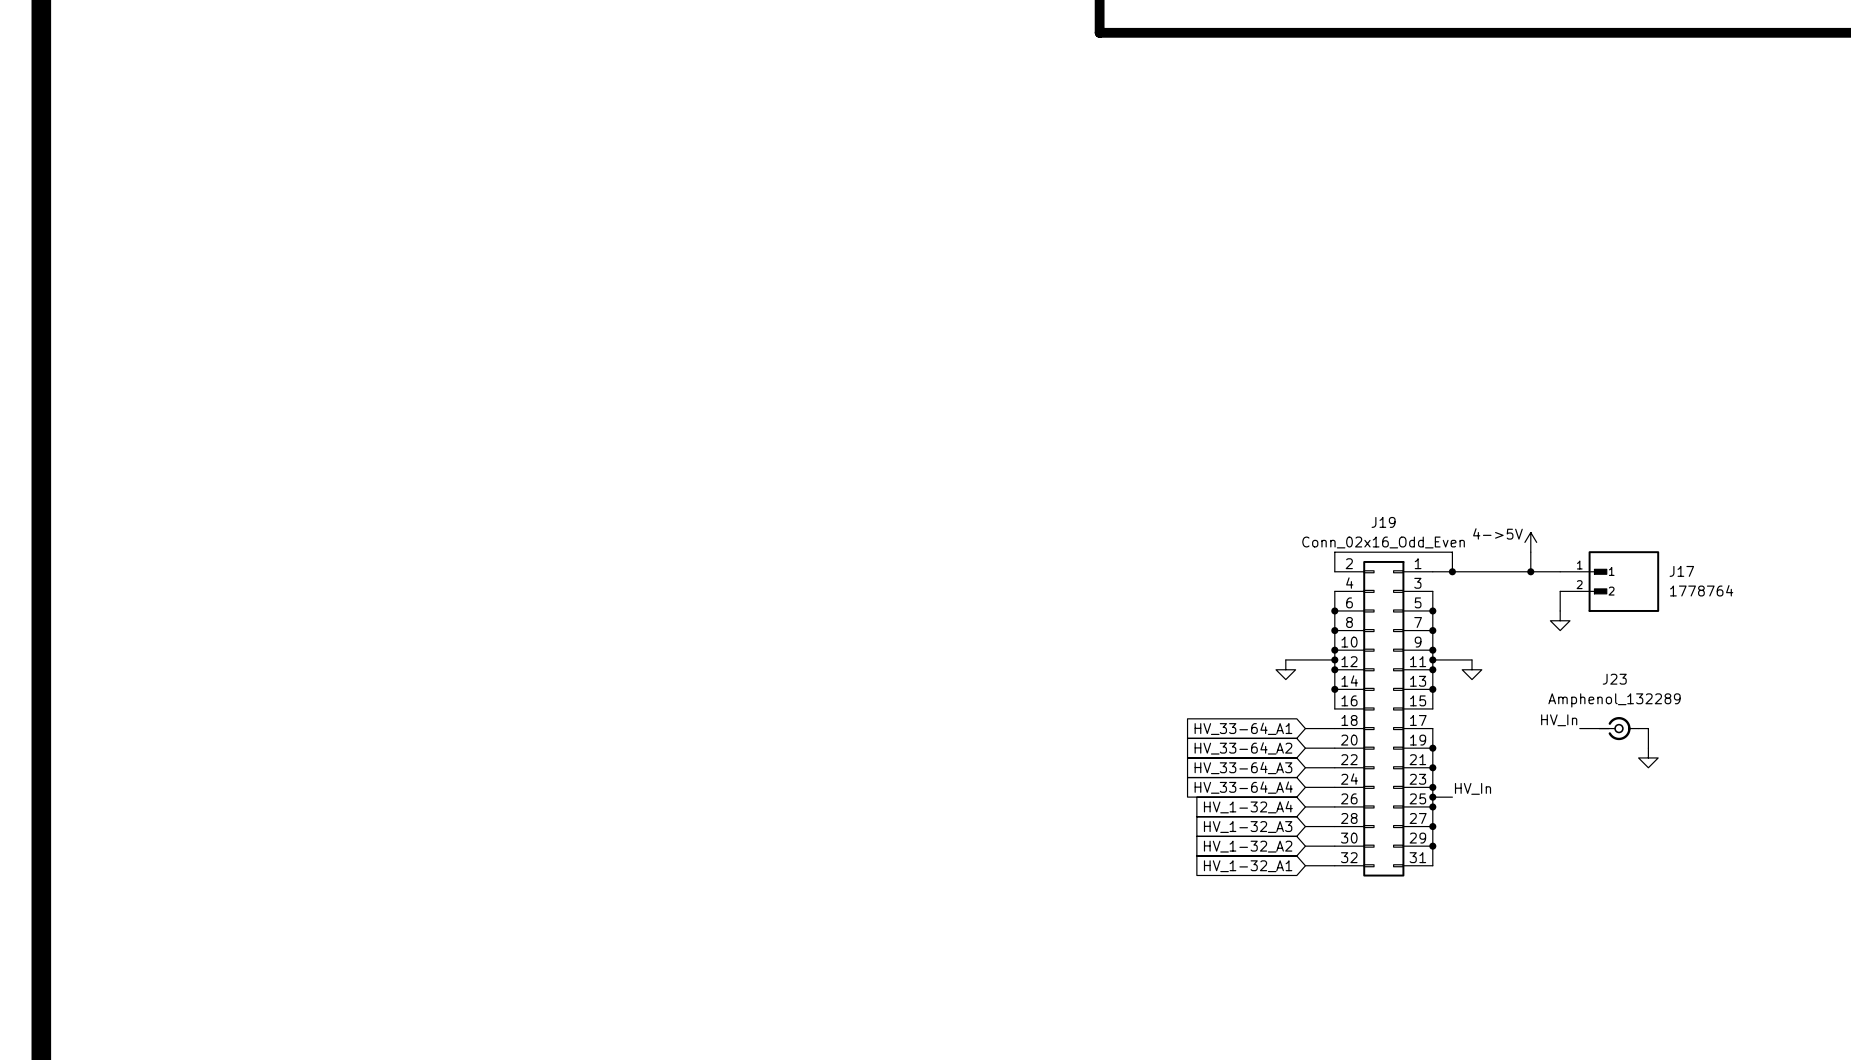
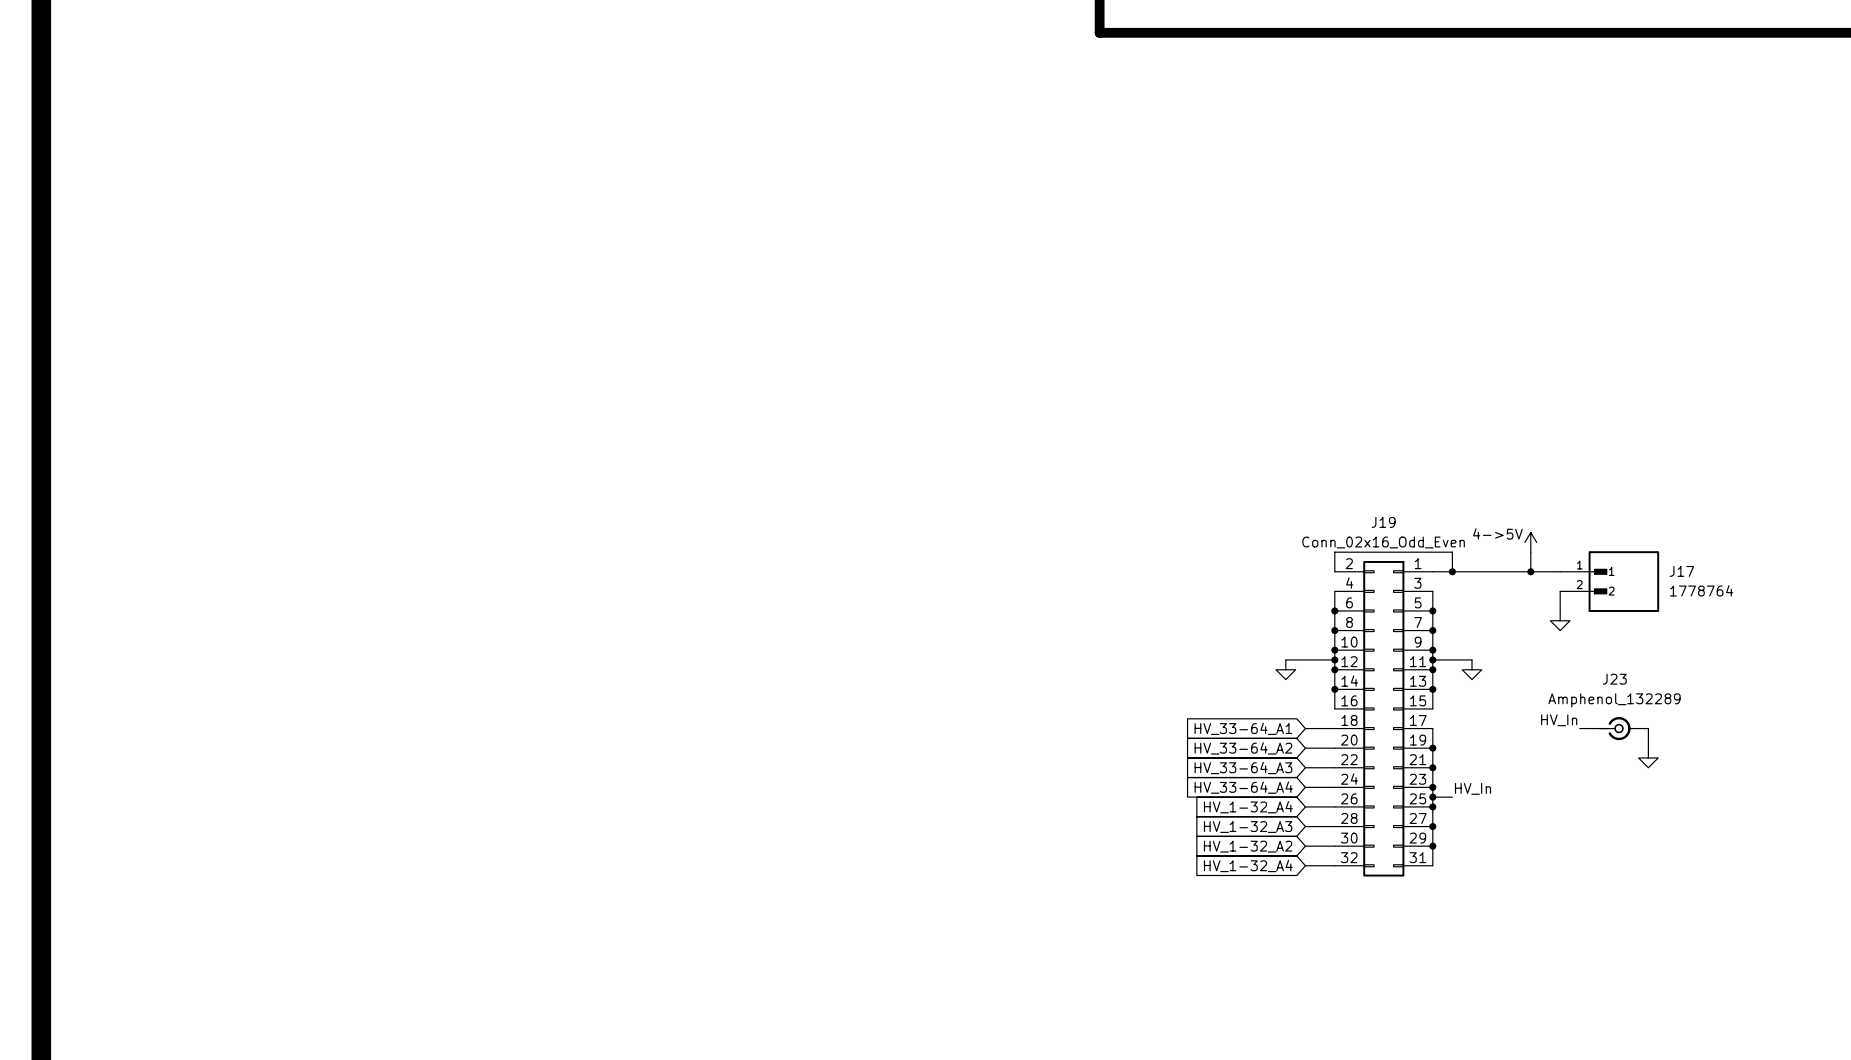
global label: HV_1-32_A1 (1248, 866) -> HV_1-32_A4 (1248, 865)

